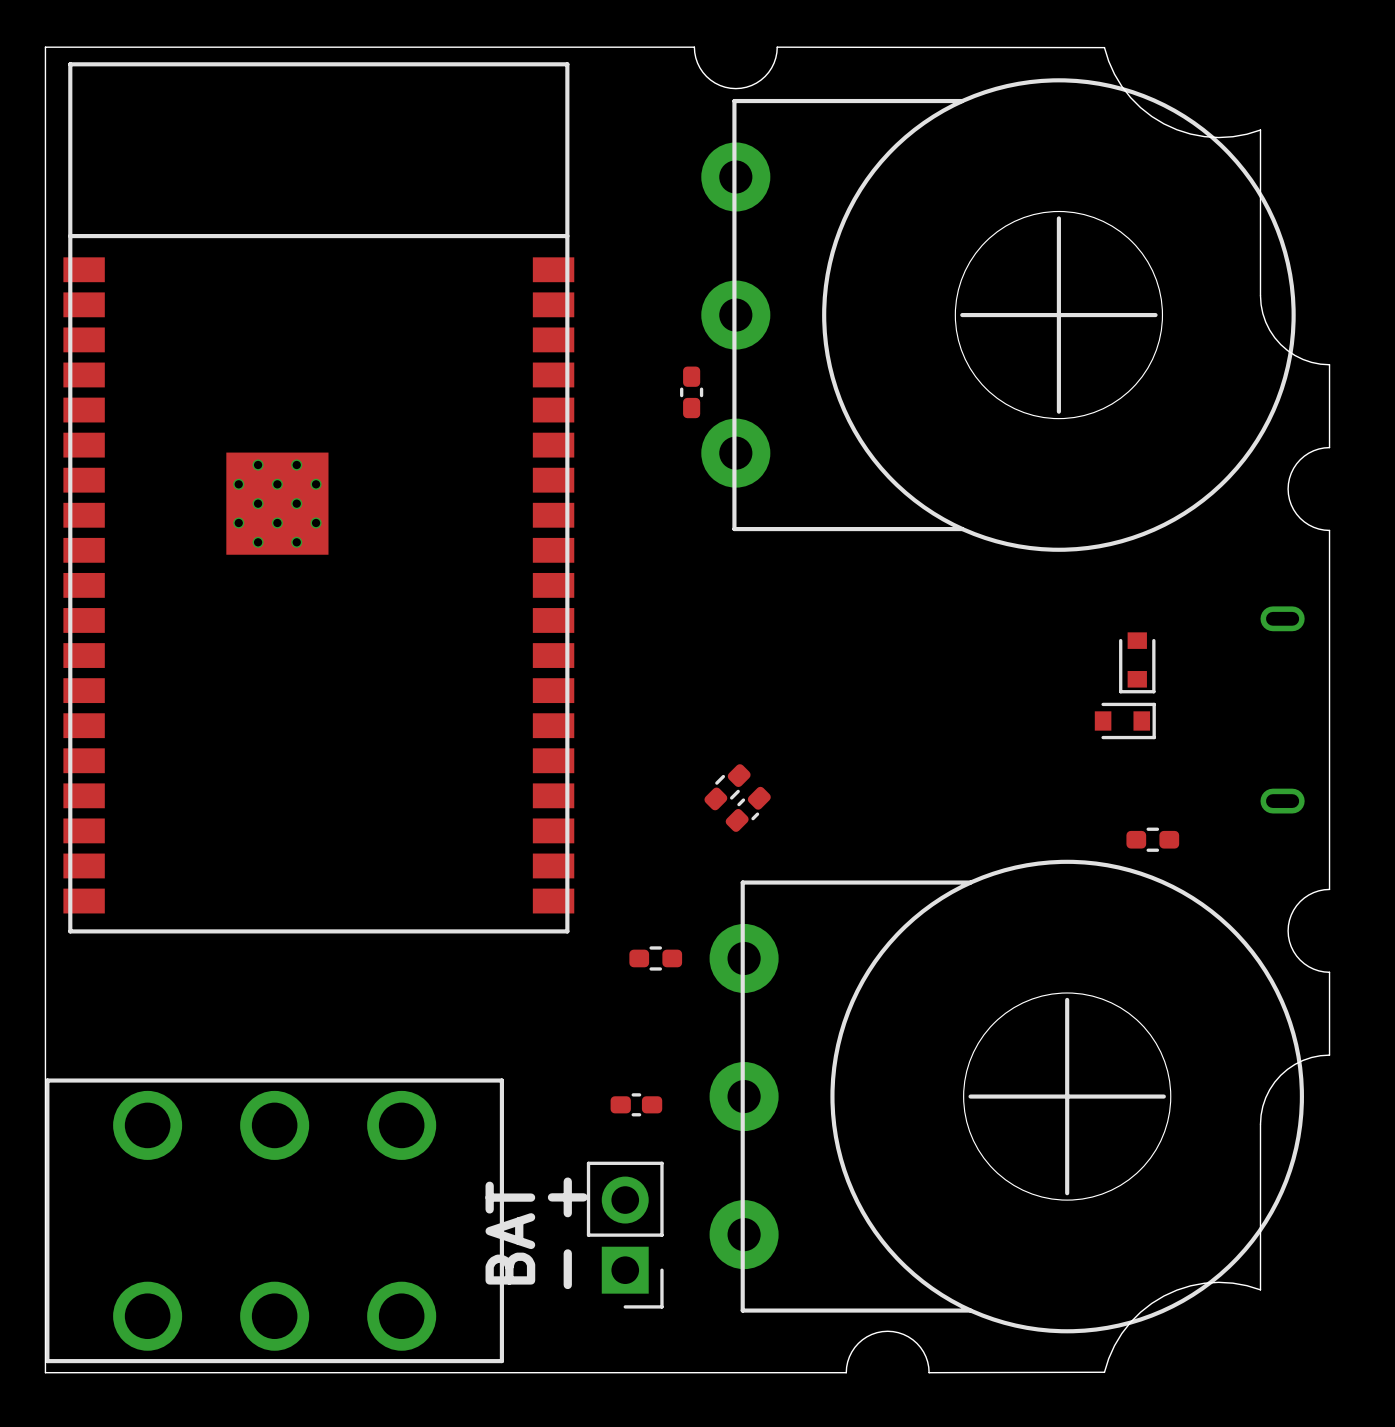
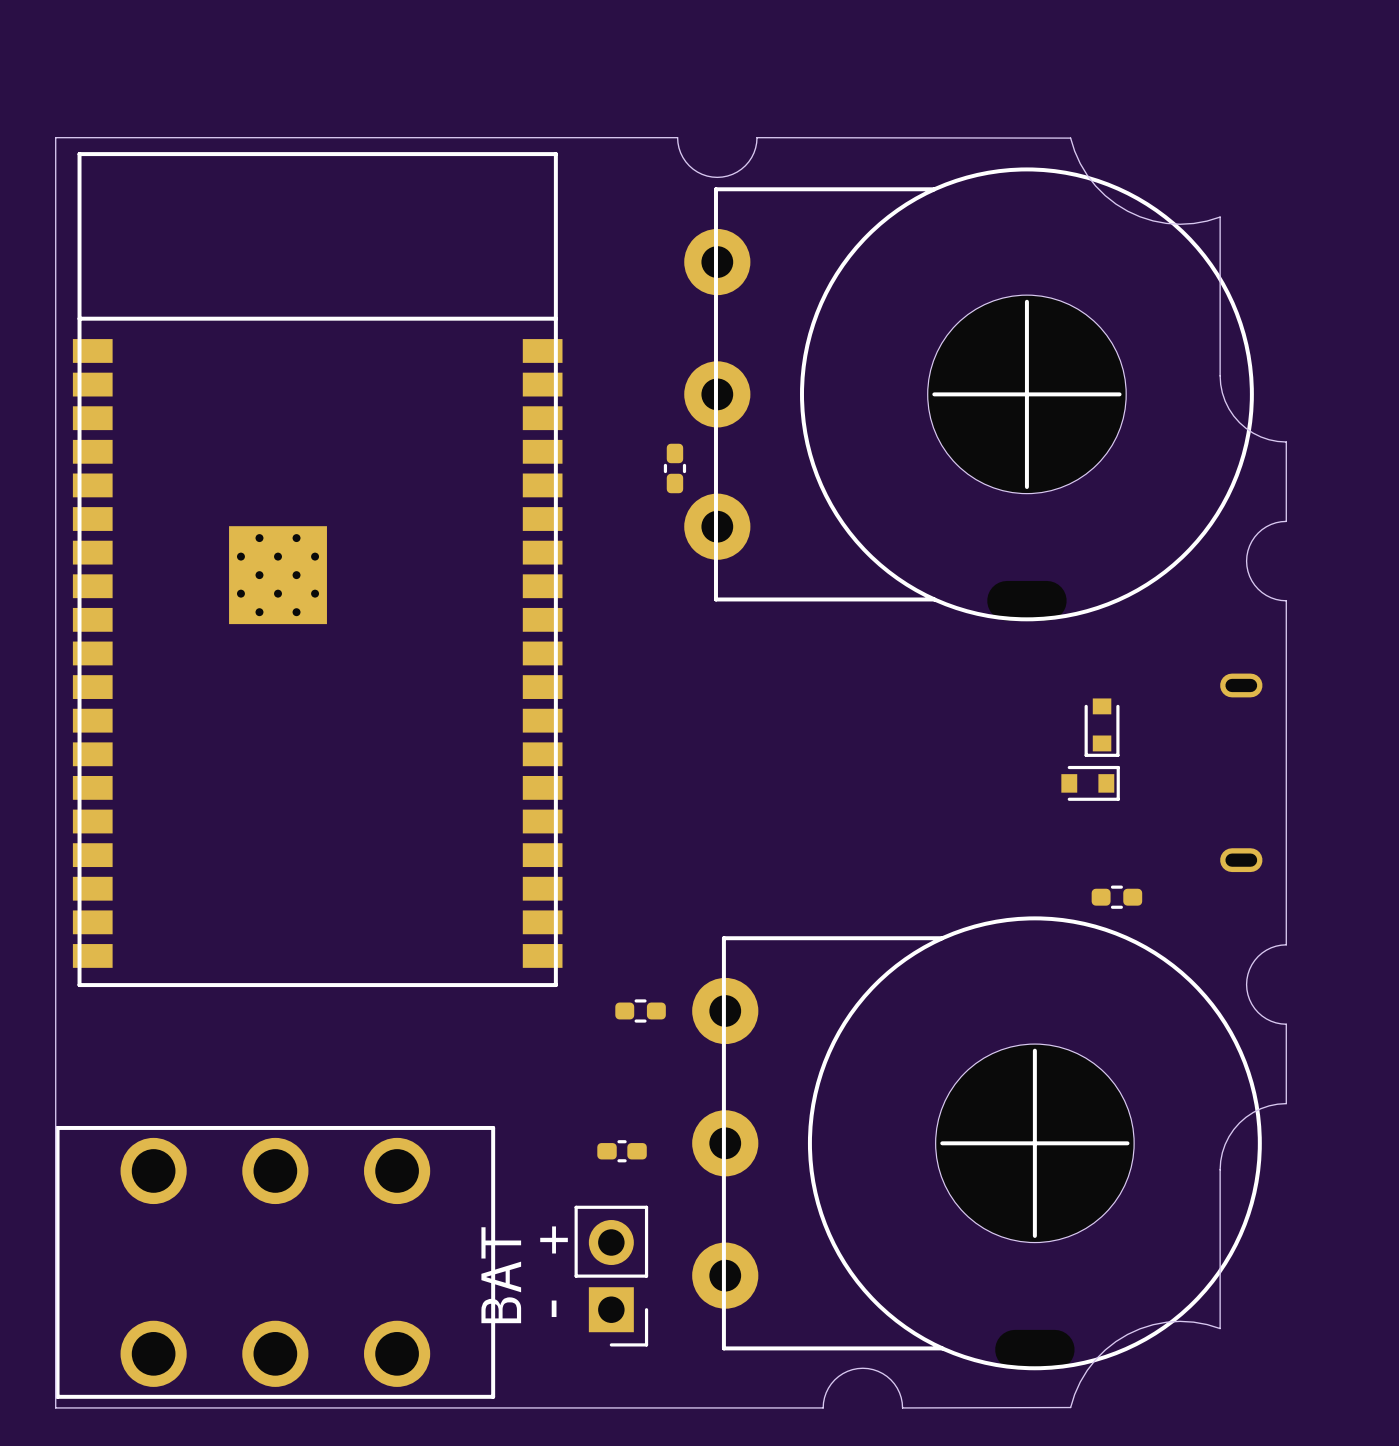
part: (727, 787) -> none
part: (748, 809) -> none

